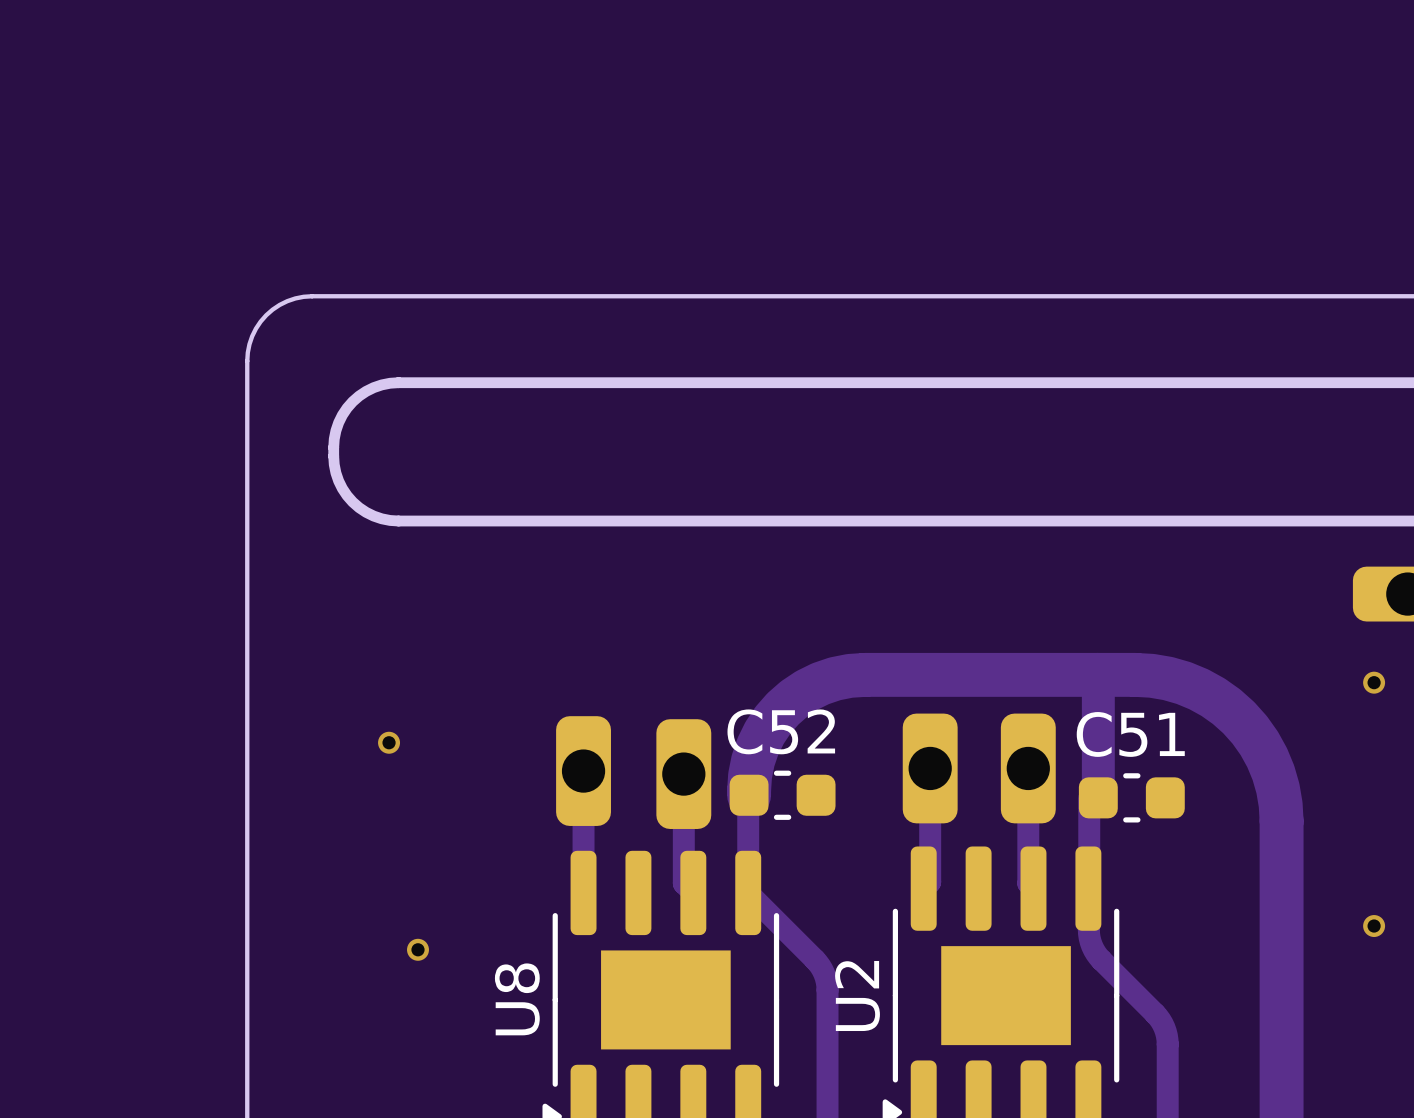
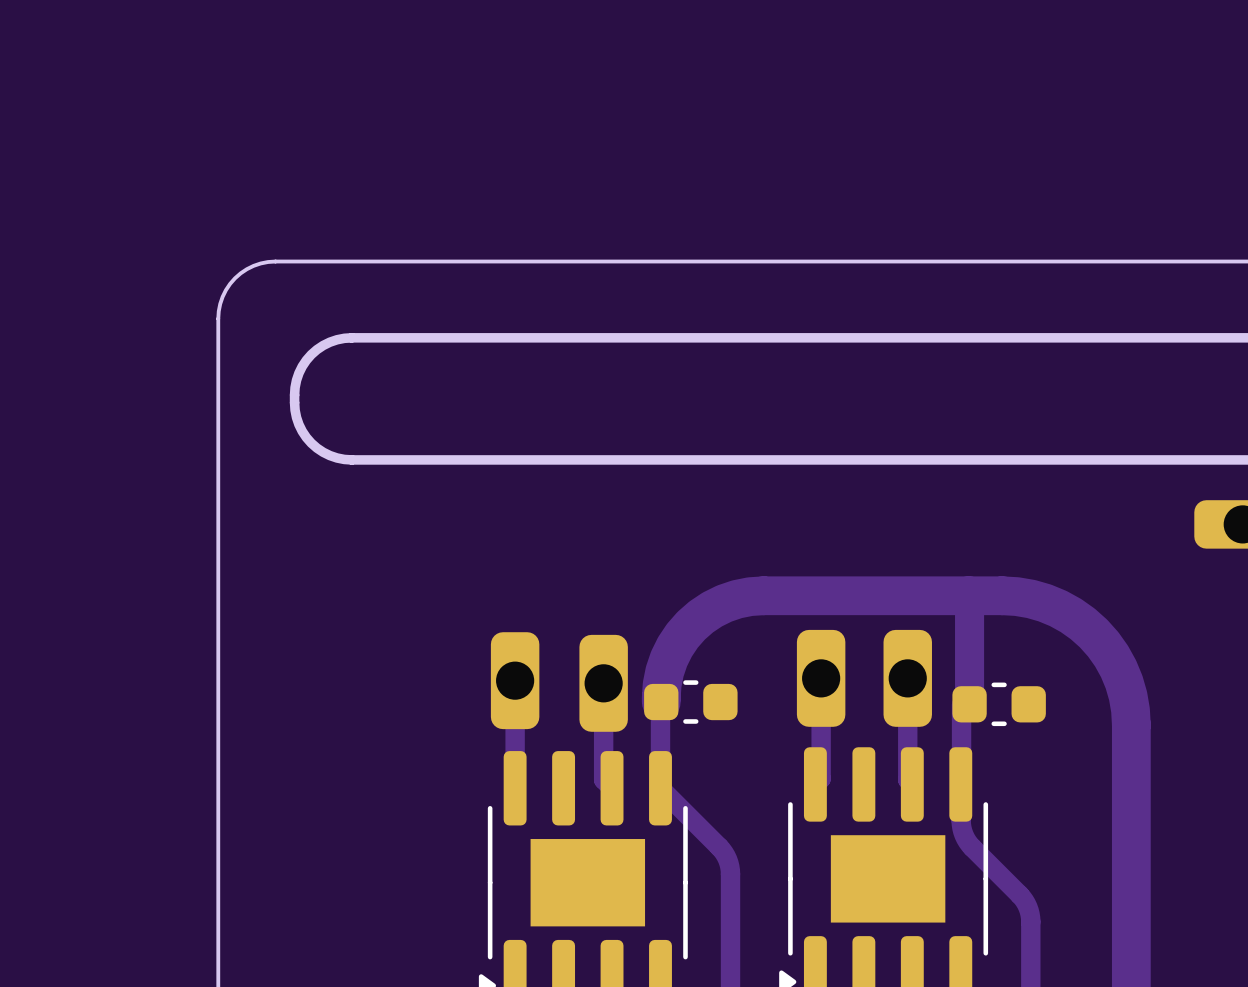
via: (1374, 682) -> none
C52 name: C52 (781, 731) -> none
C51 name: C51 (1130, 734) -> none
via: (389, 742) -> none
via: (1374, 926) -> none
via: (417, 949) -> none
U2 name: U2 (857, 996) -> none
U8 name: U8 (517, 999) -> none

